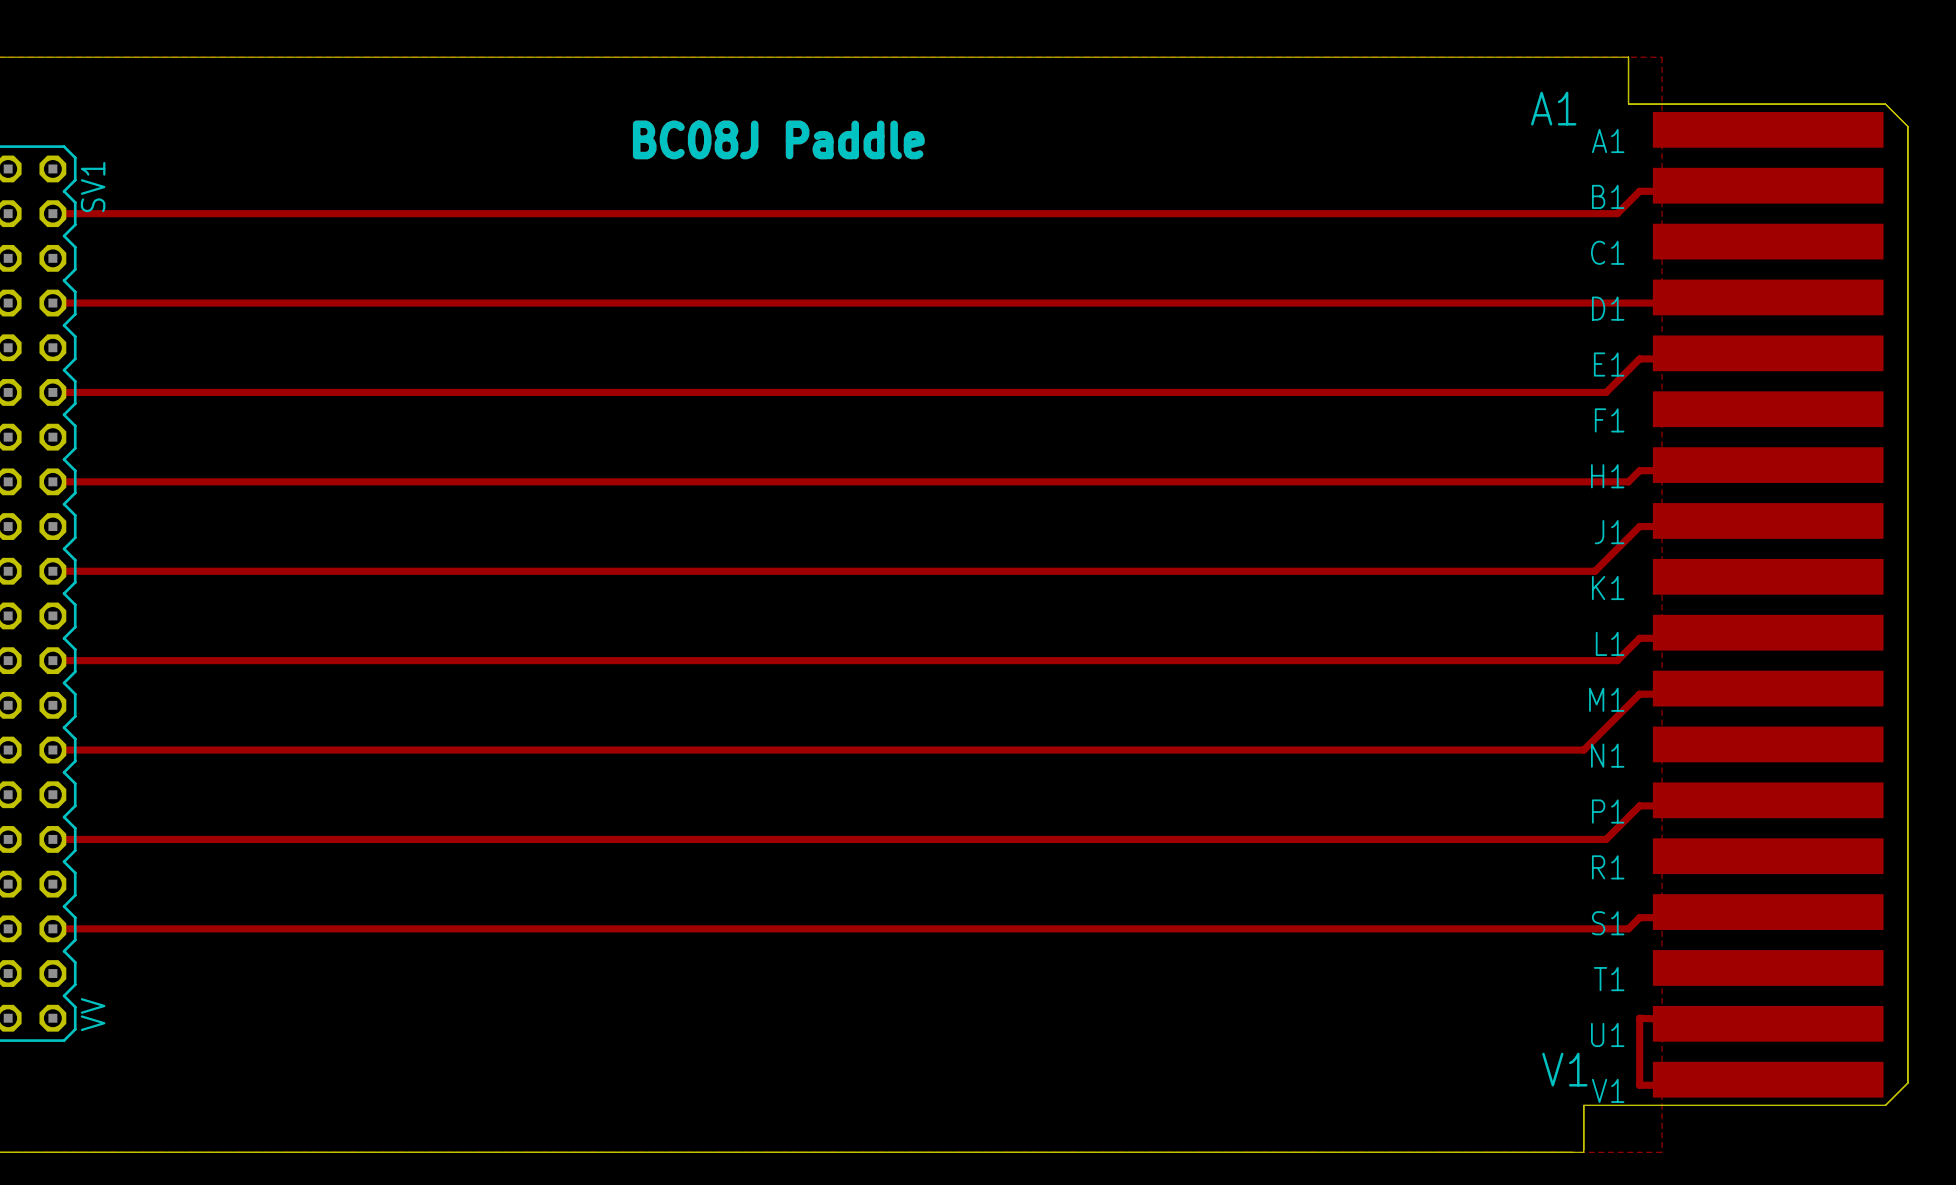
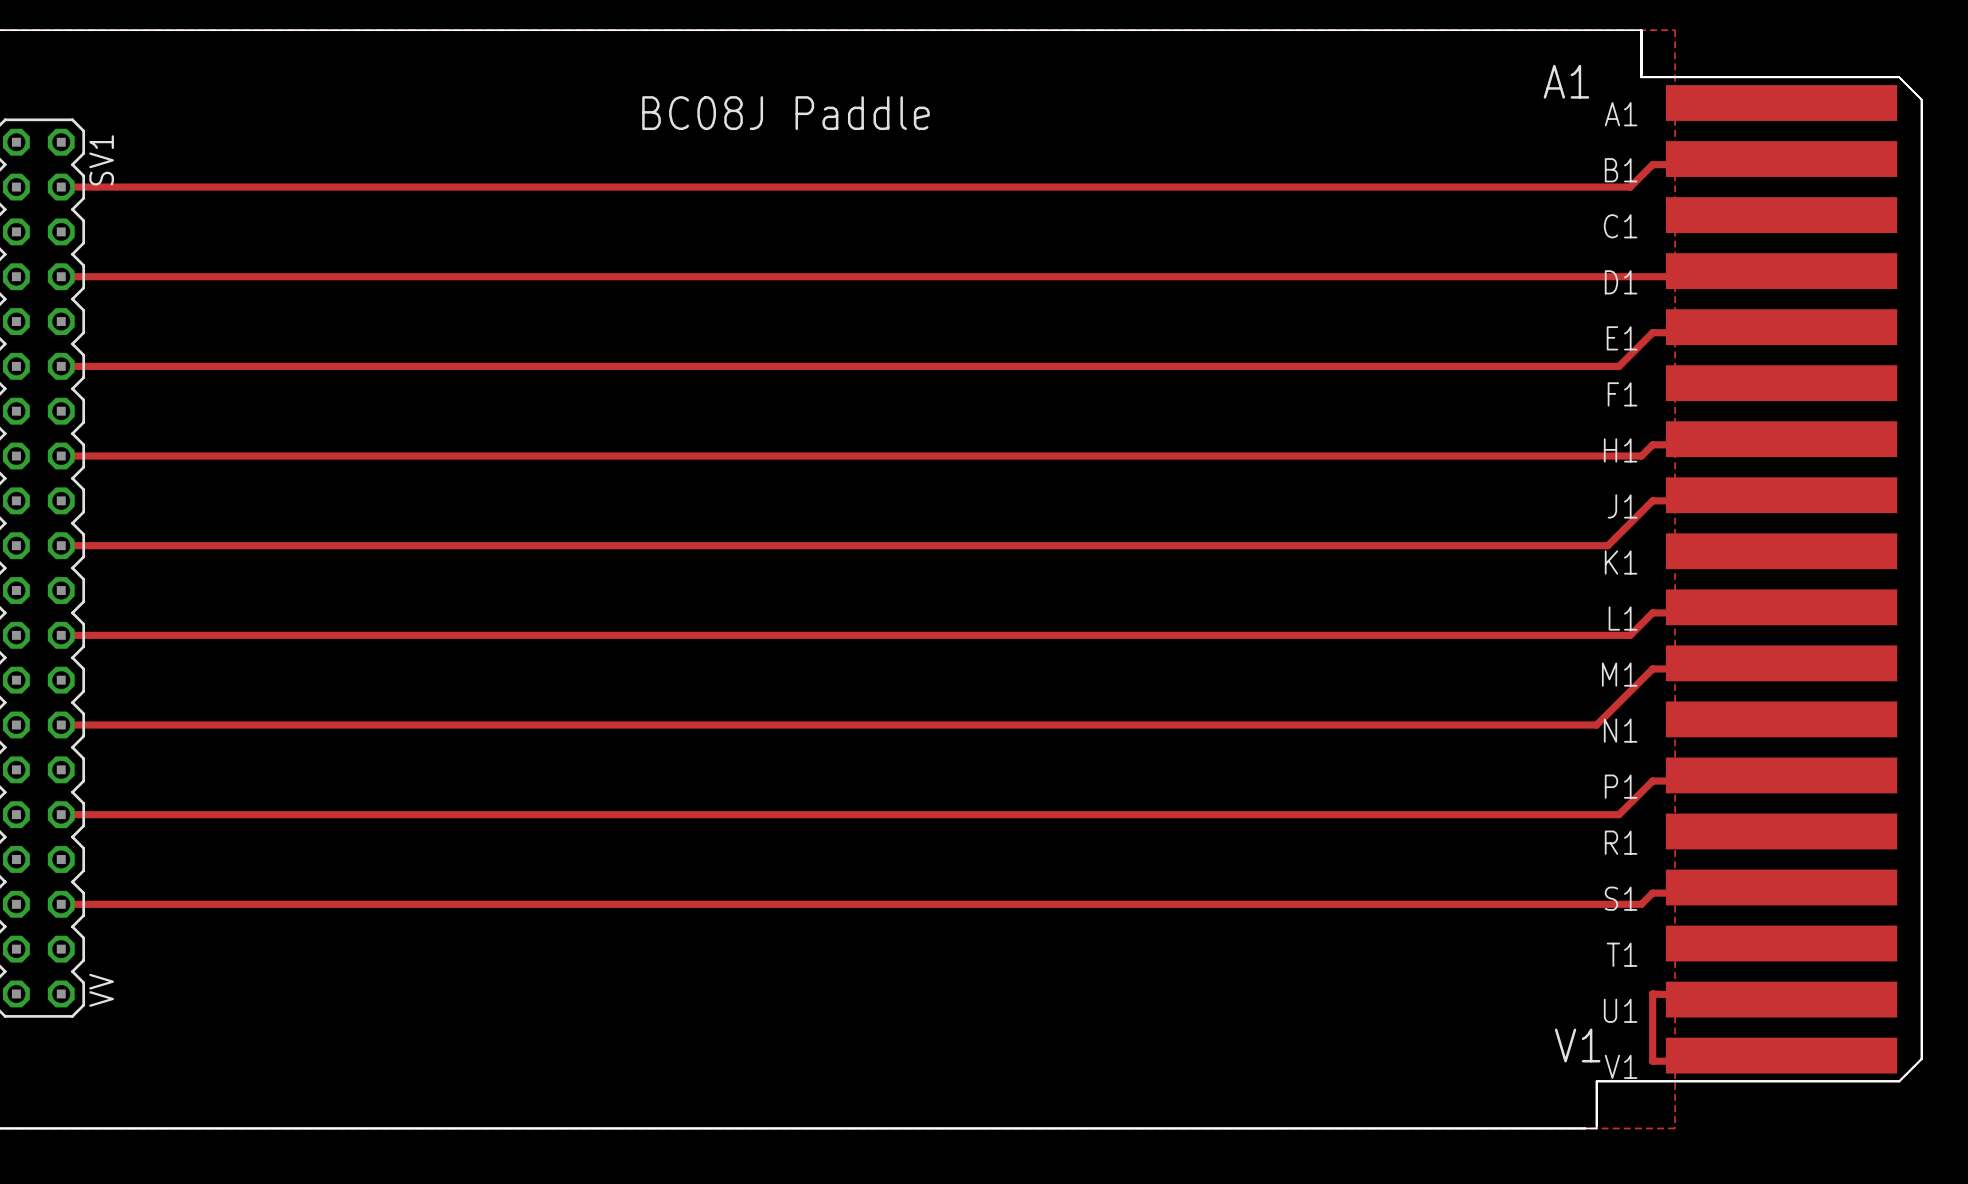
text: none -> BC08J Paddle (785, 113)
text: BC08J Paddle (778, 139) -> none

